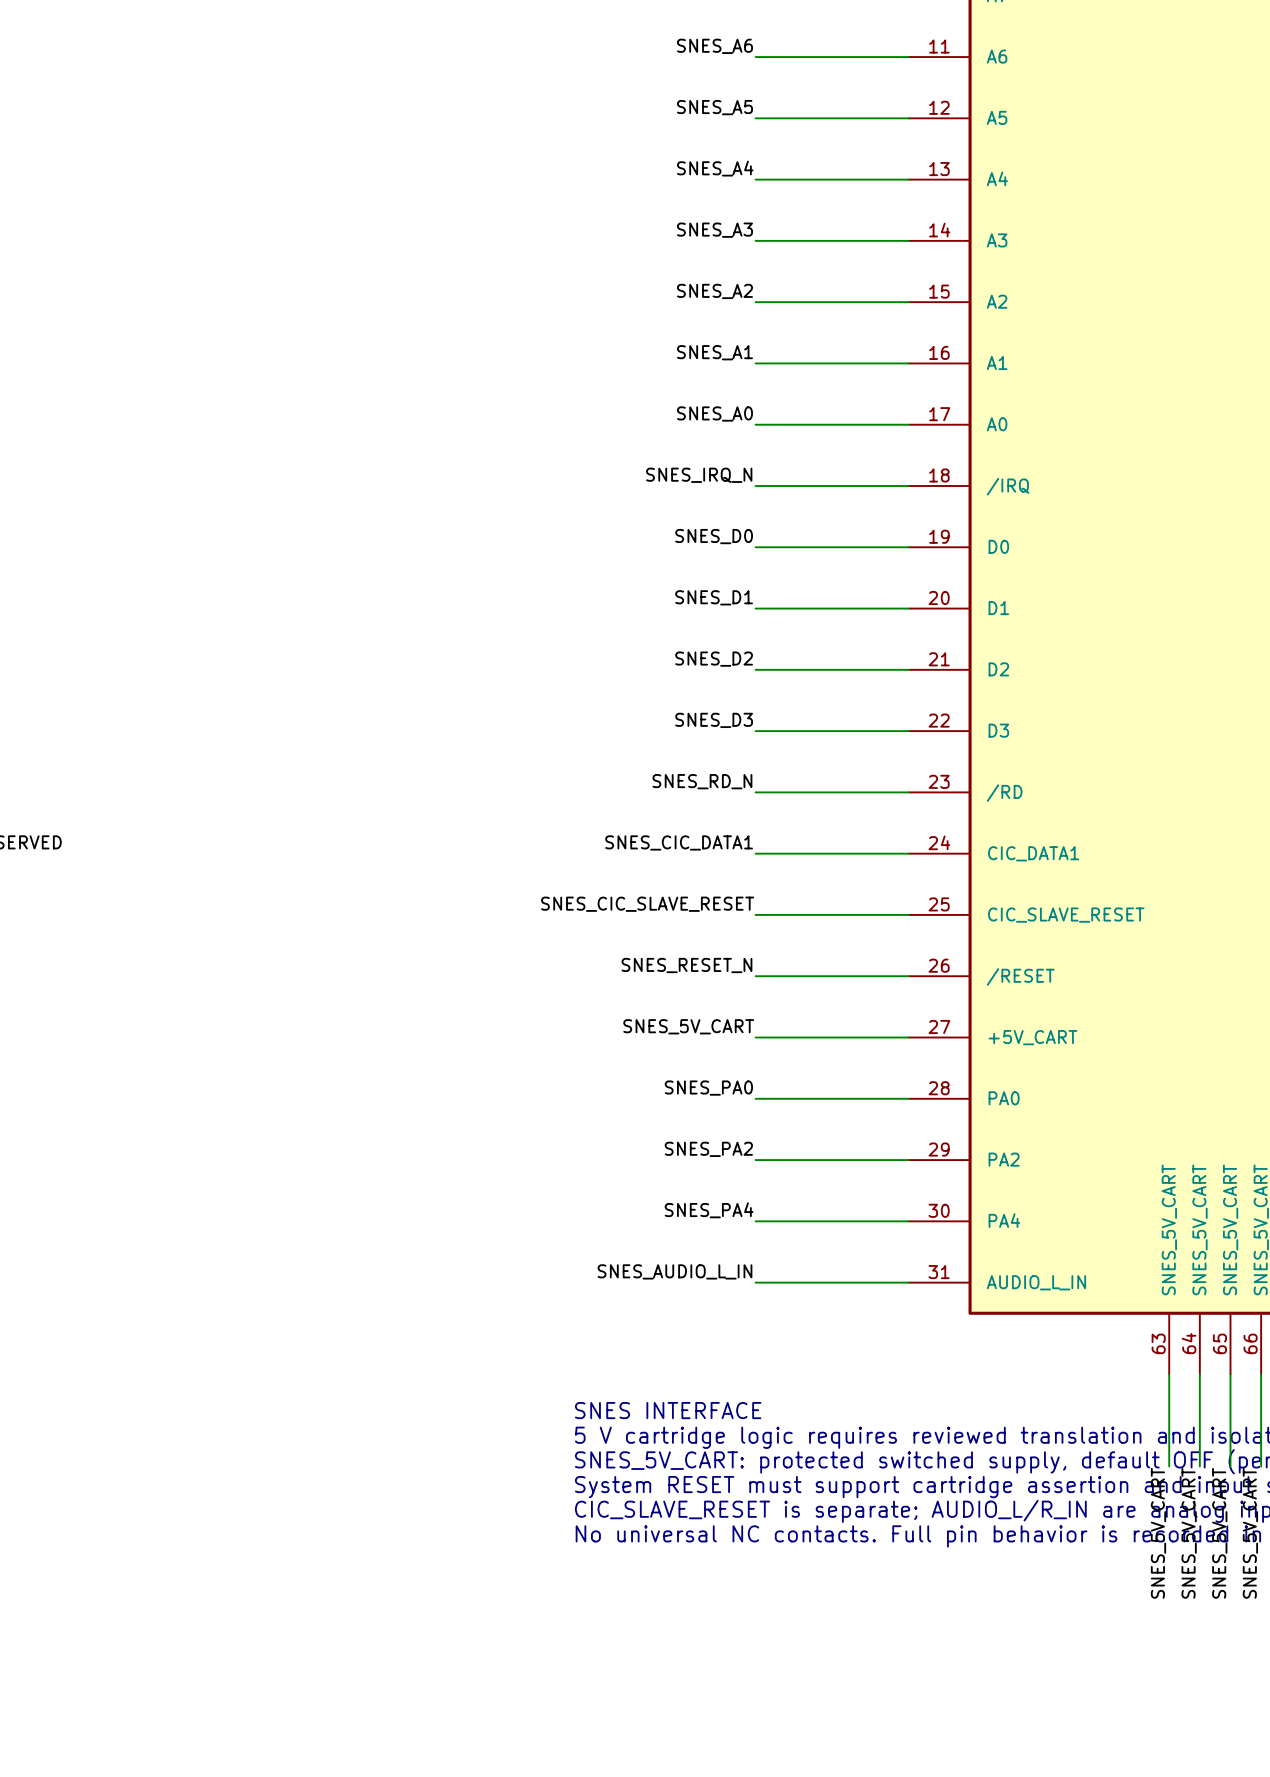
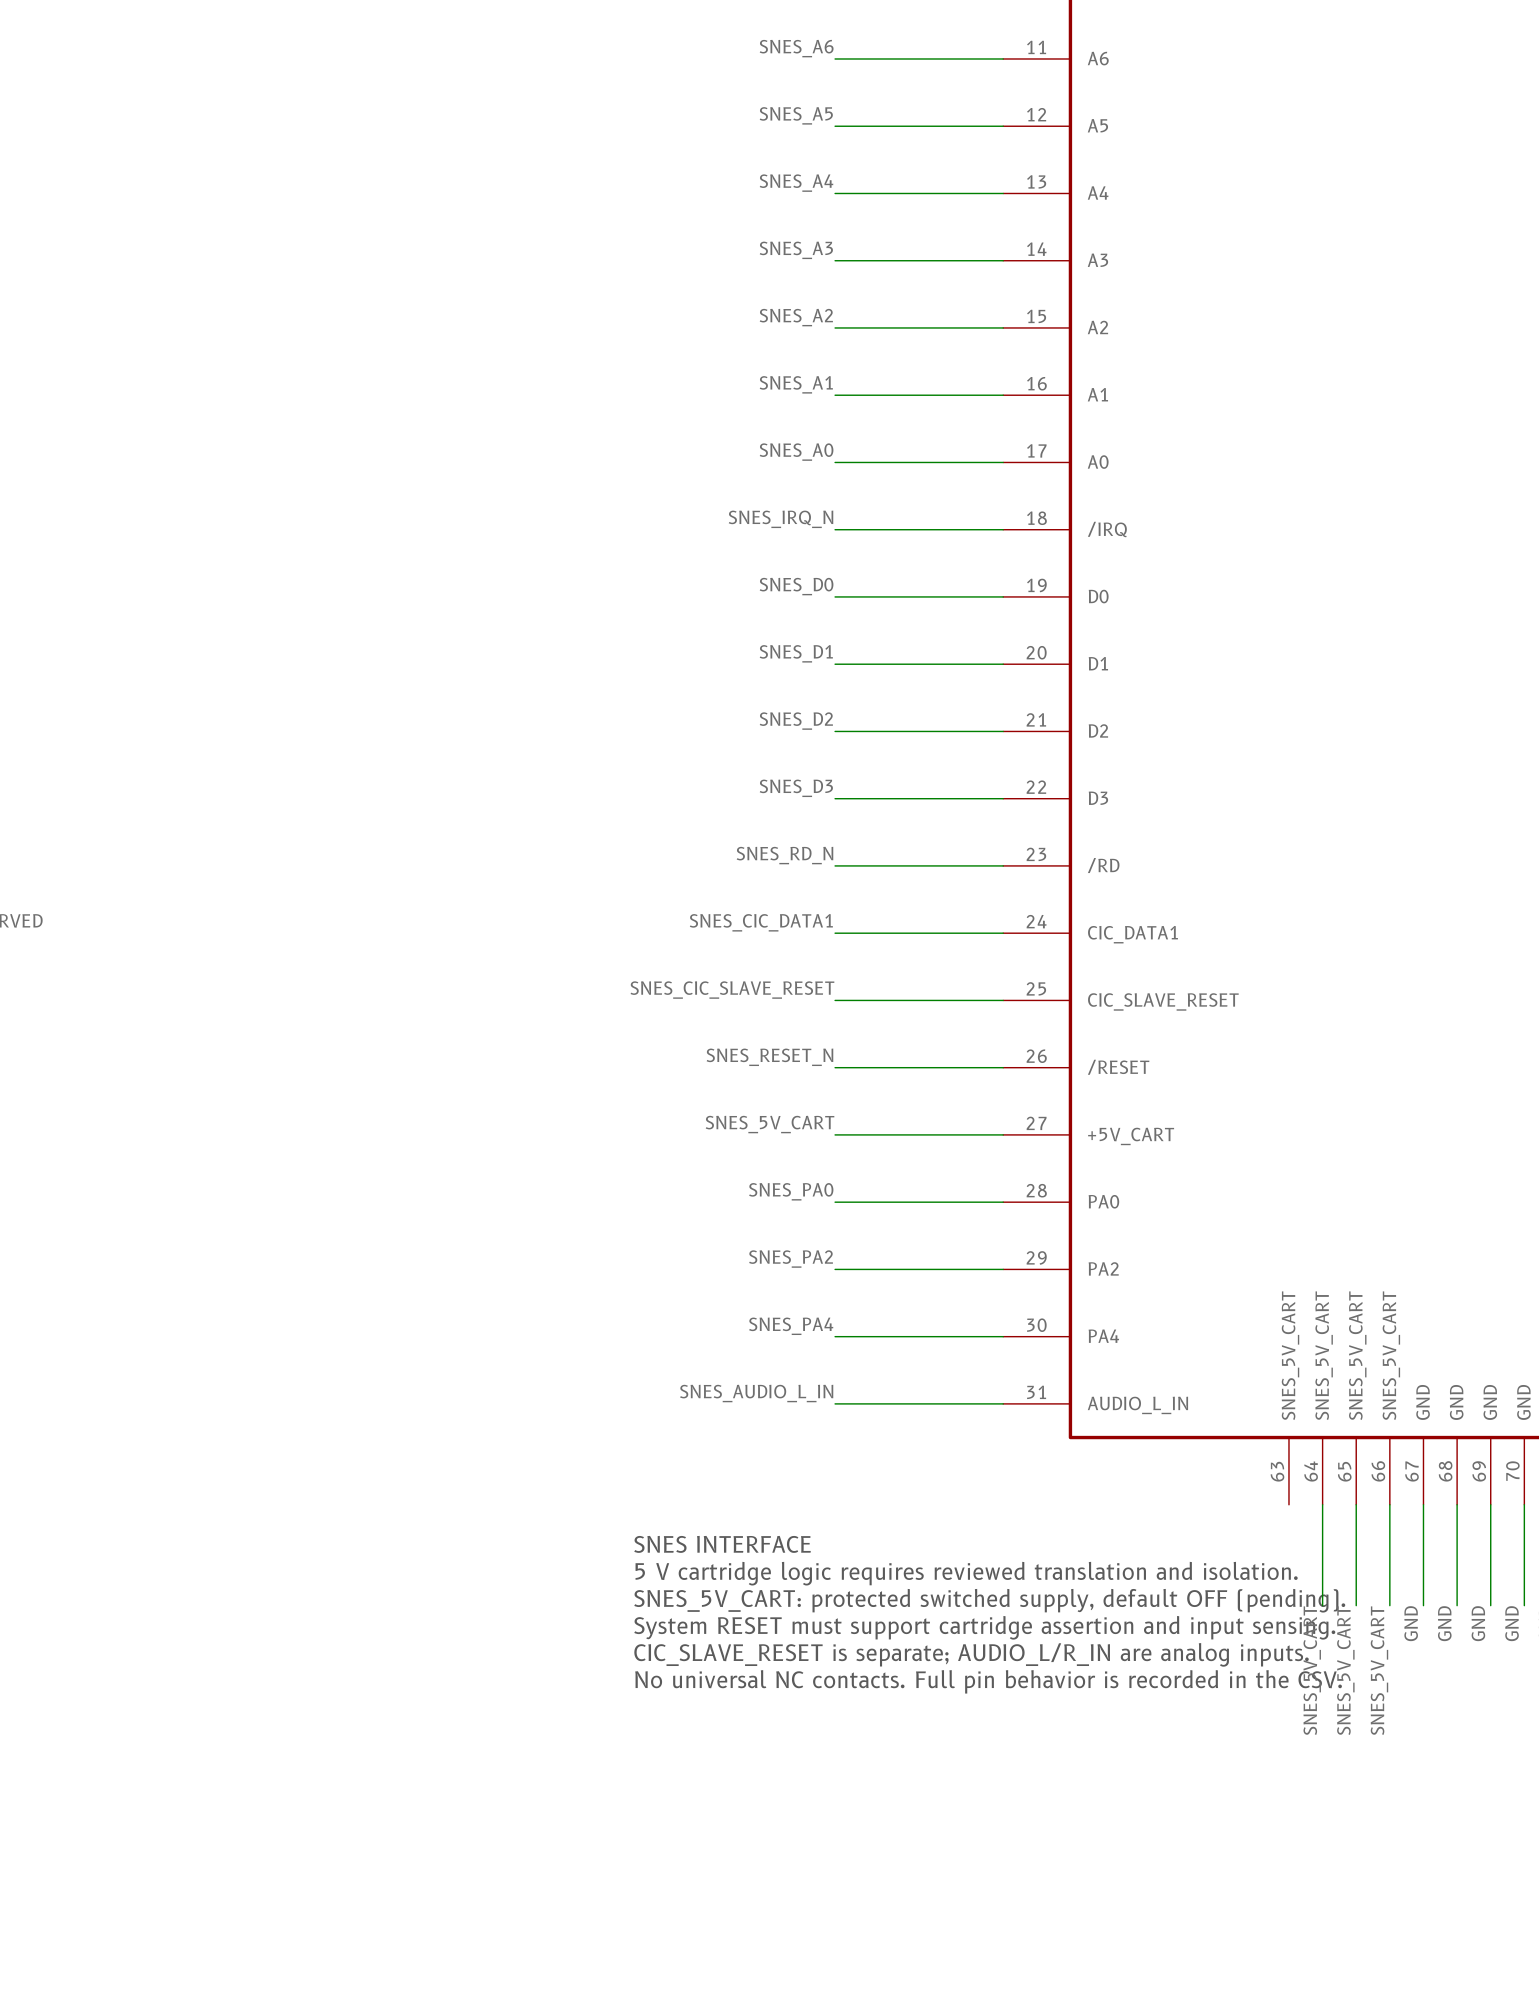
wire: (1169, 1374) (1169, 1466) -> none
label: SNES_5V_CART (1158, 1533) -> none

